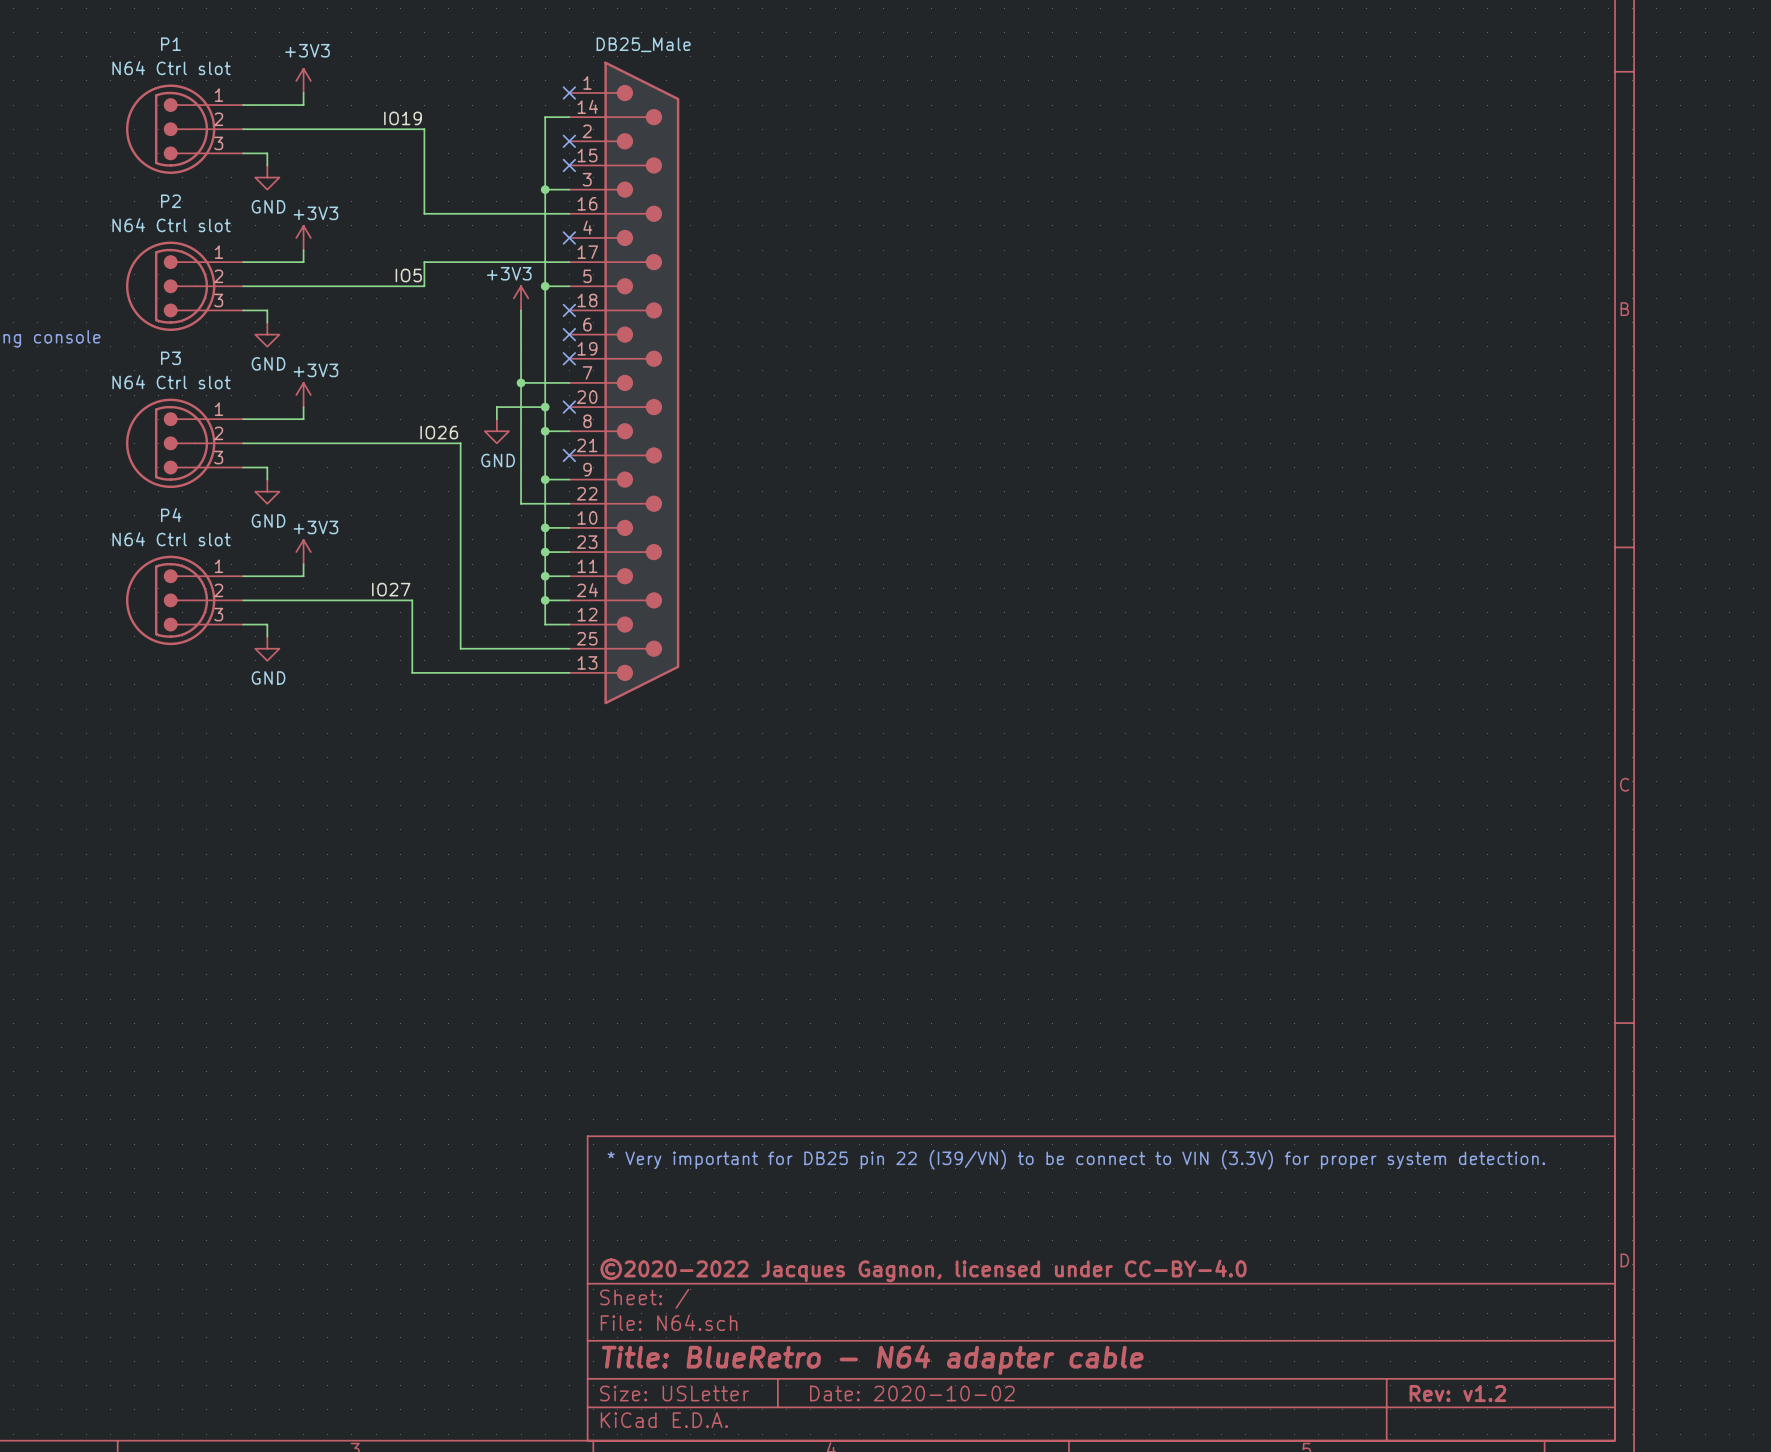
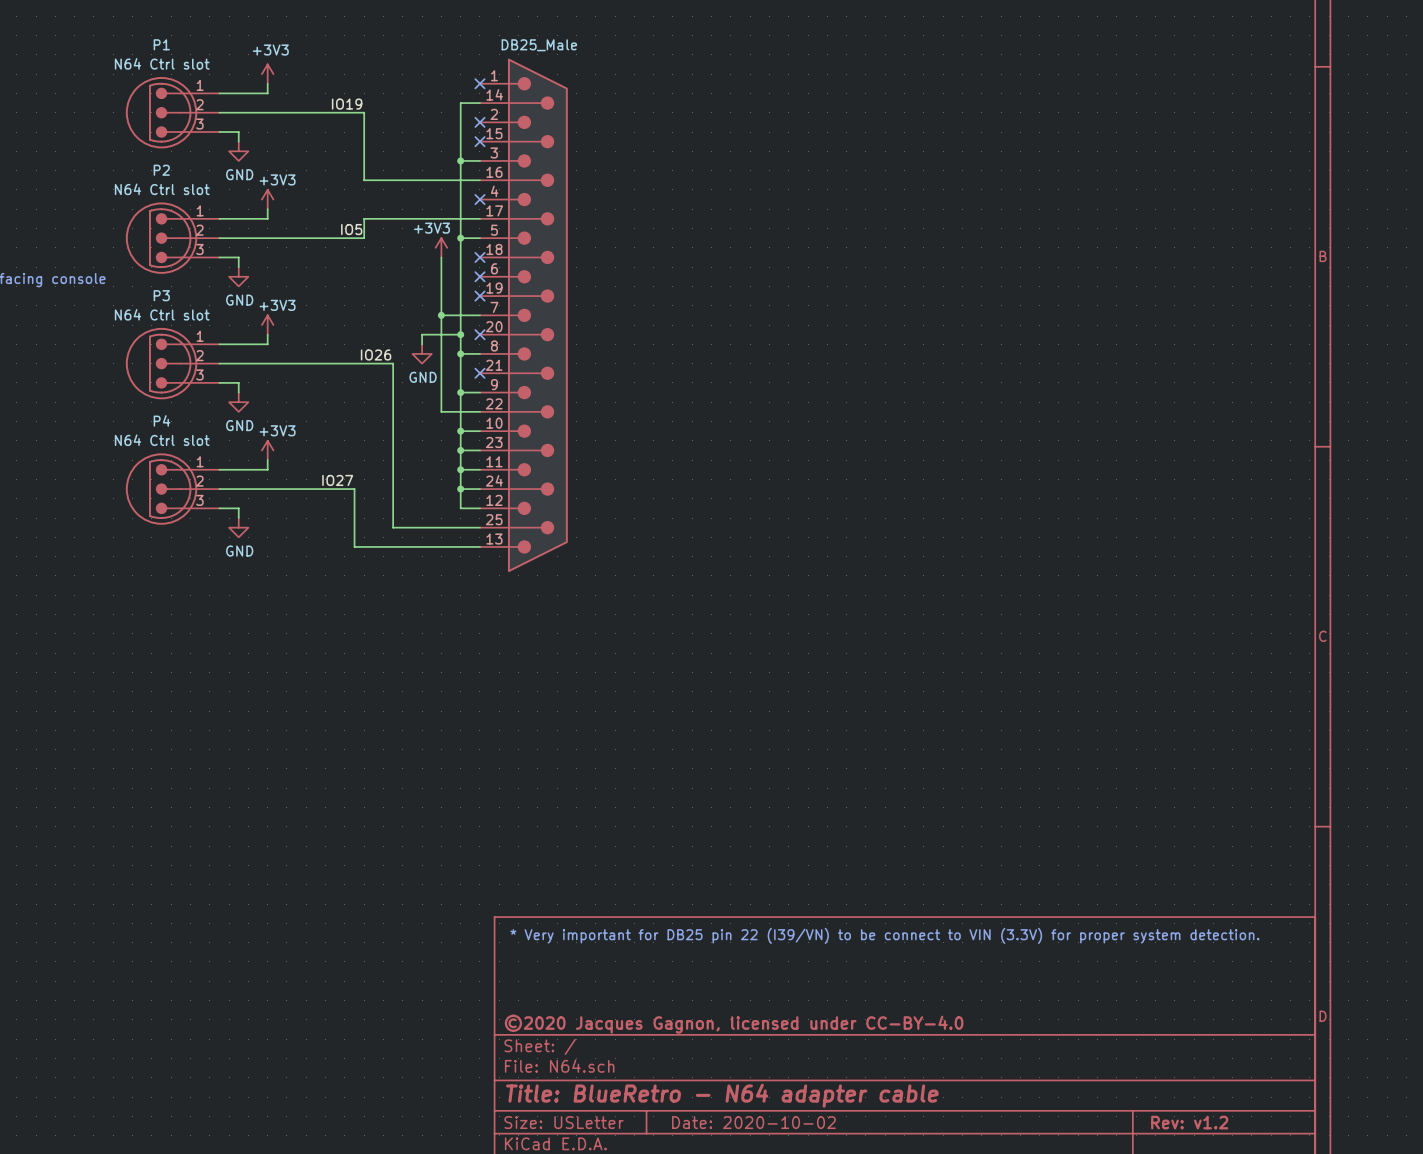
title block: ©2020-2022 Jacques Gagnon, licensed under CC-BY-4.0 (923, 1270) -> ©2020 Jacques Gagnon, licensed under CC-BY-4.0 (734, 1024)

